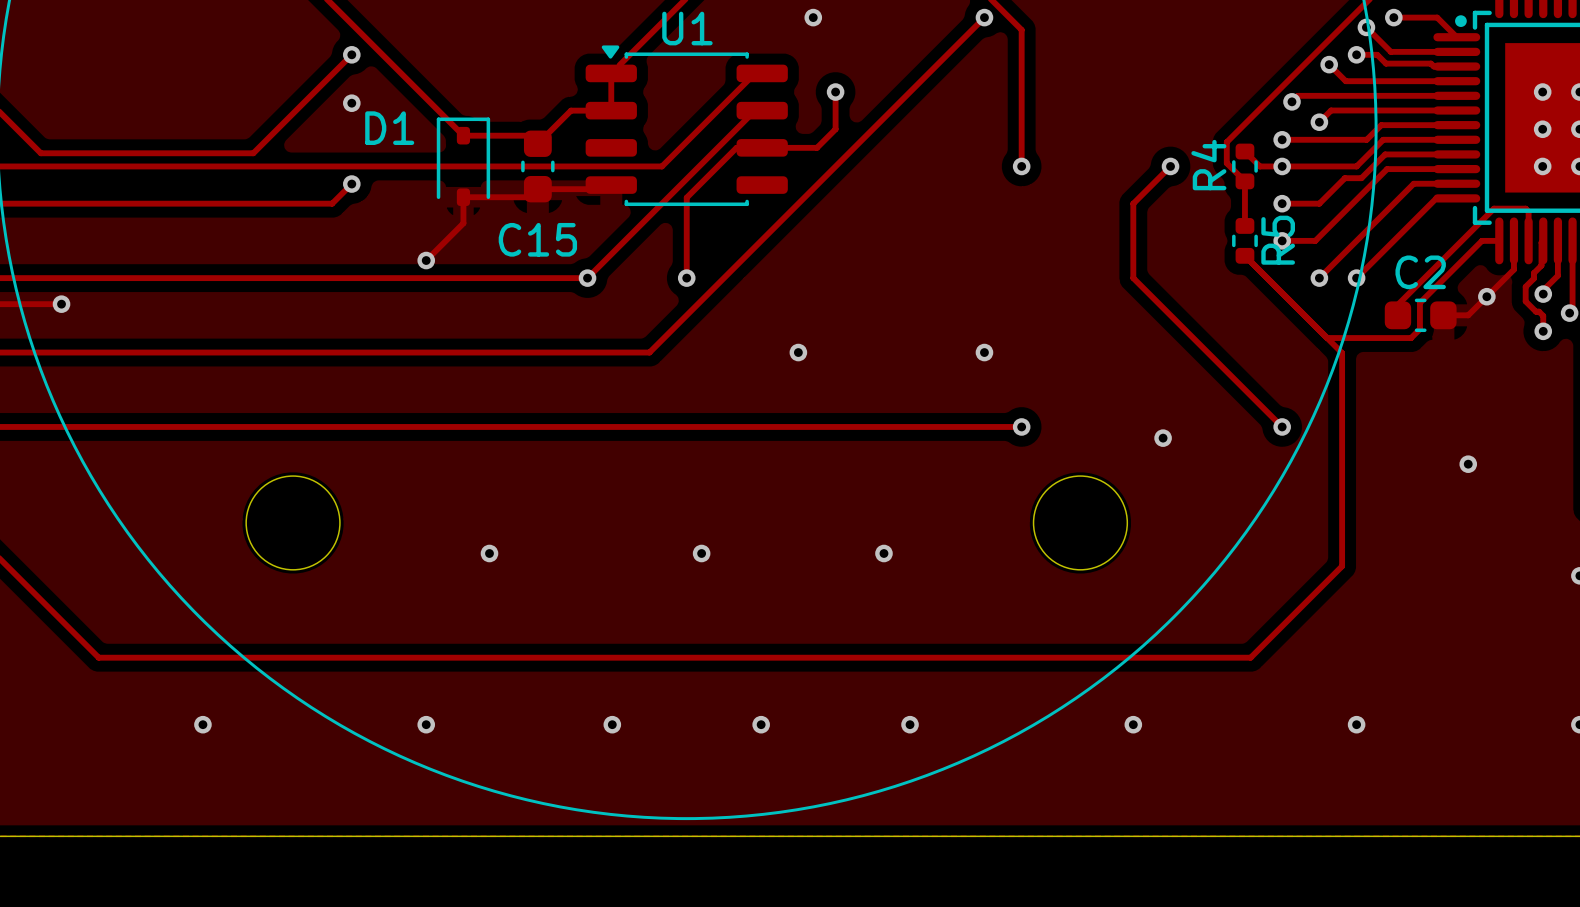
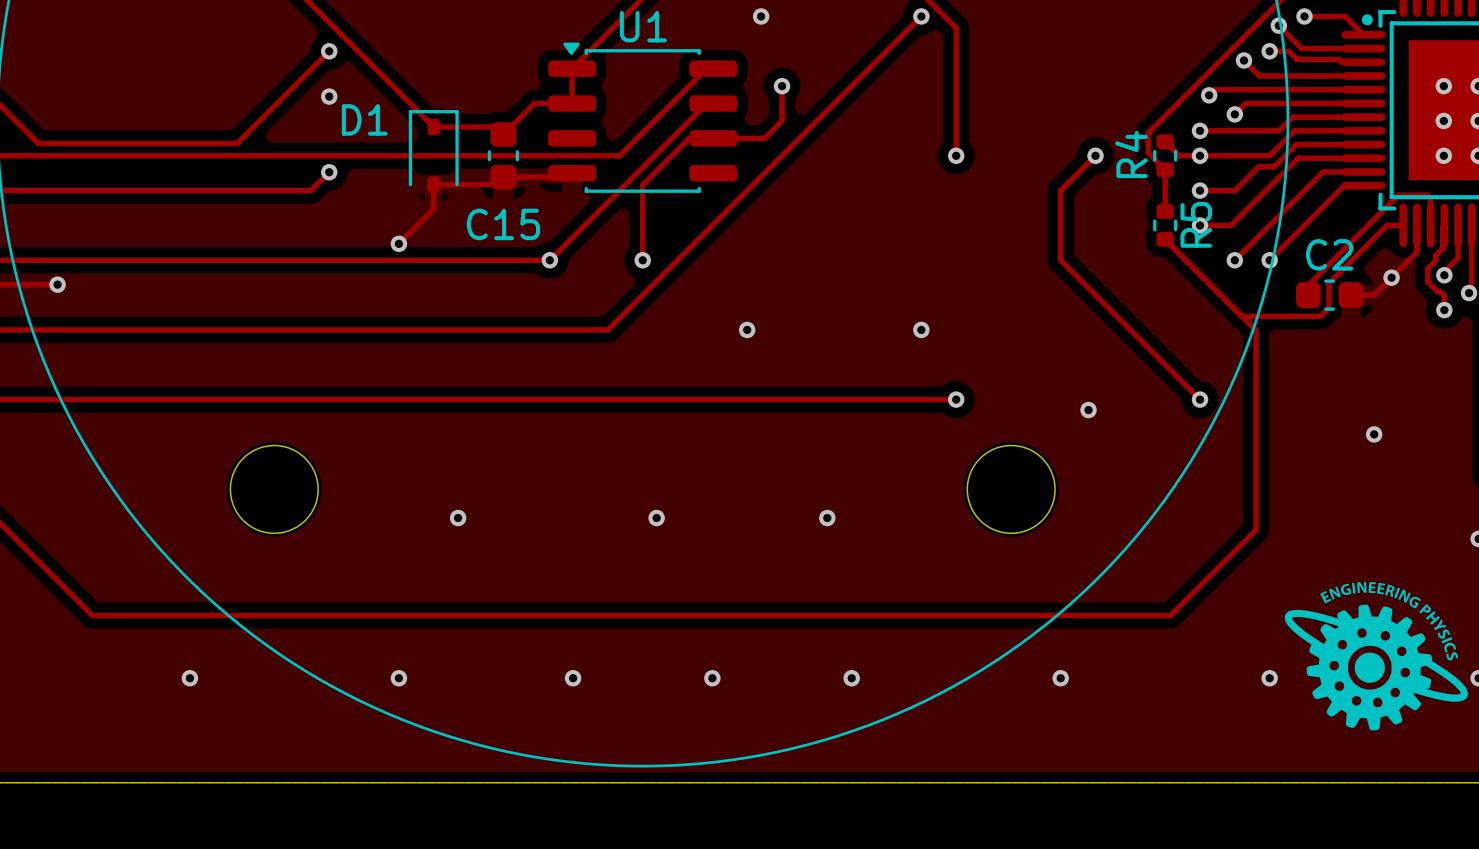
drawing: none -> [1284, 581, 1468, 731]

